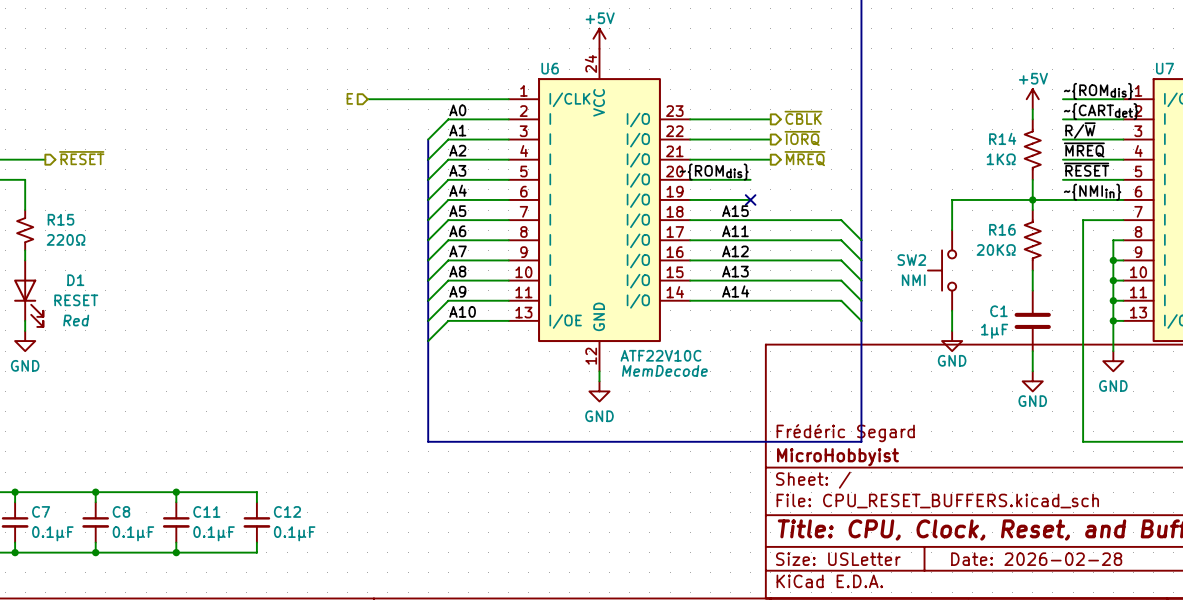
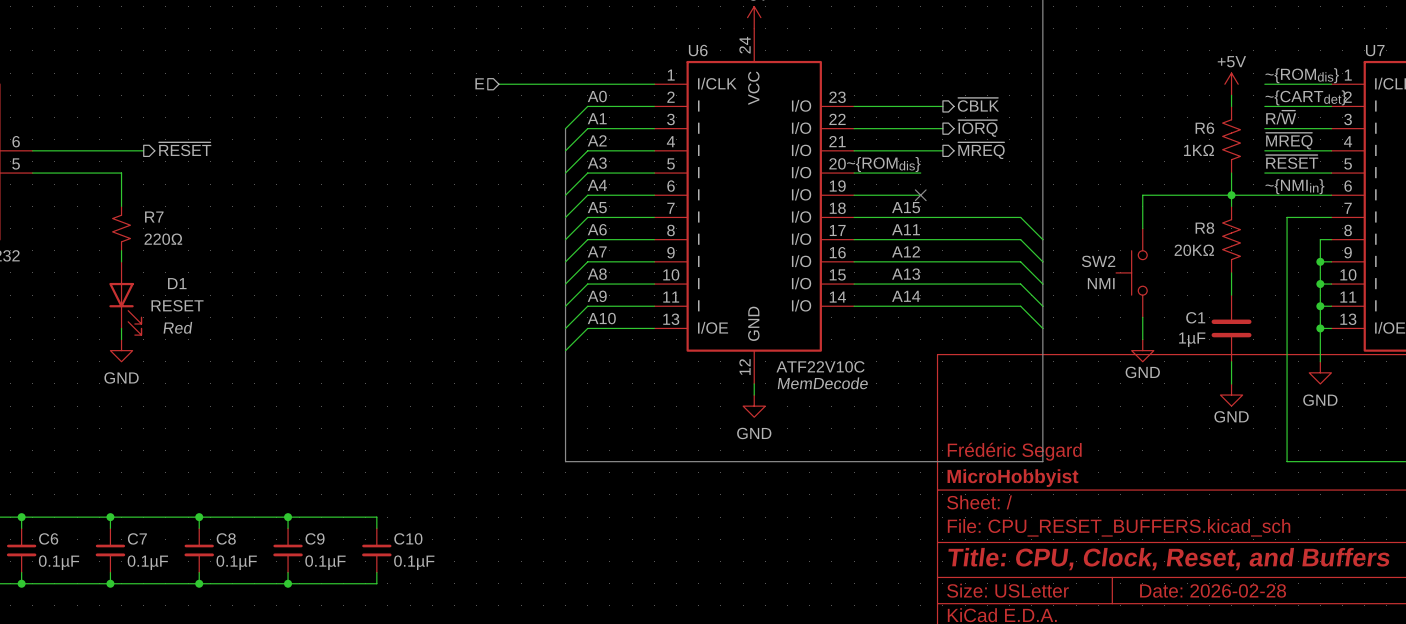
R14 name: R14 (1002, 138) -> R6 (1204, 128)
R15 name: R15 (61, 219) -> R7 (154, 217)
R16 name: R16 (1002, 229) -> R8 (1204, 228)
C11 name: C11 (206, 511) -> C9 (315, 538)
C12 name: C12 (287, 511) -> C10 (408, 538)

